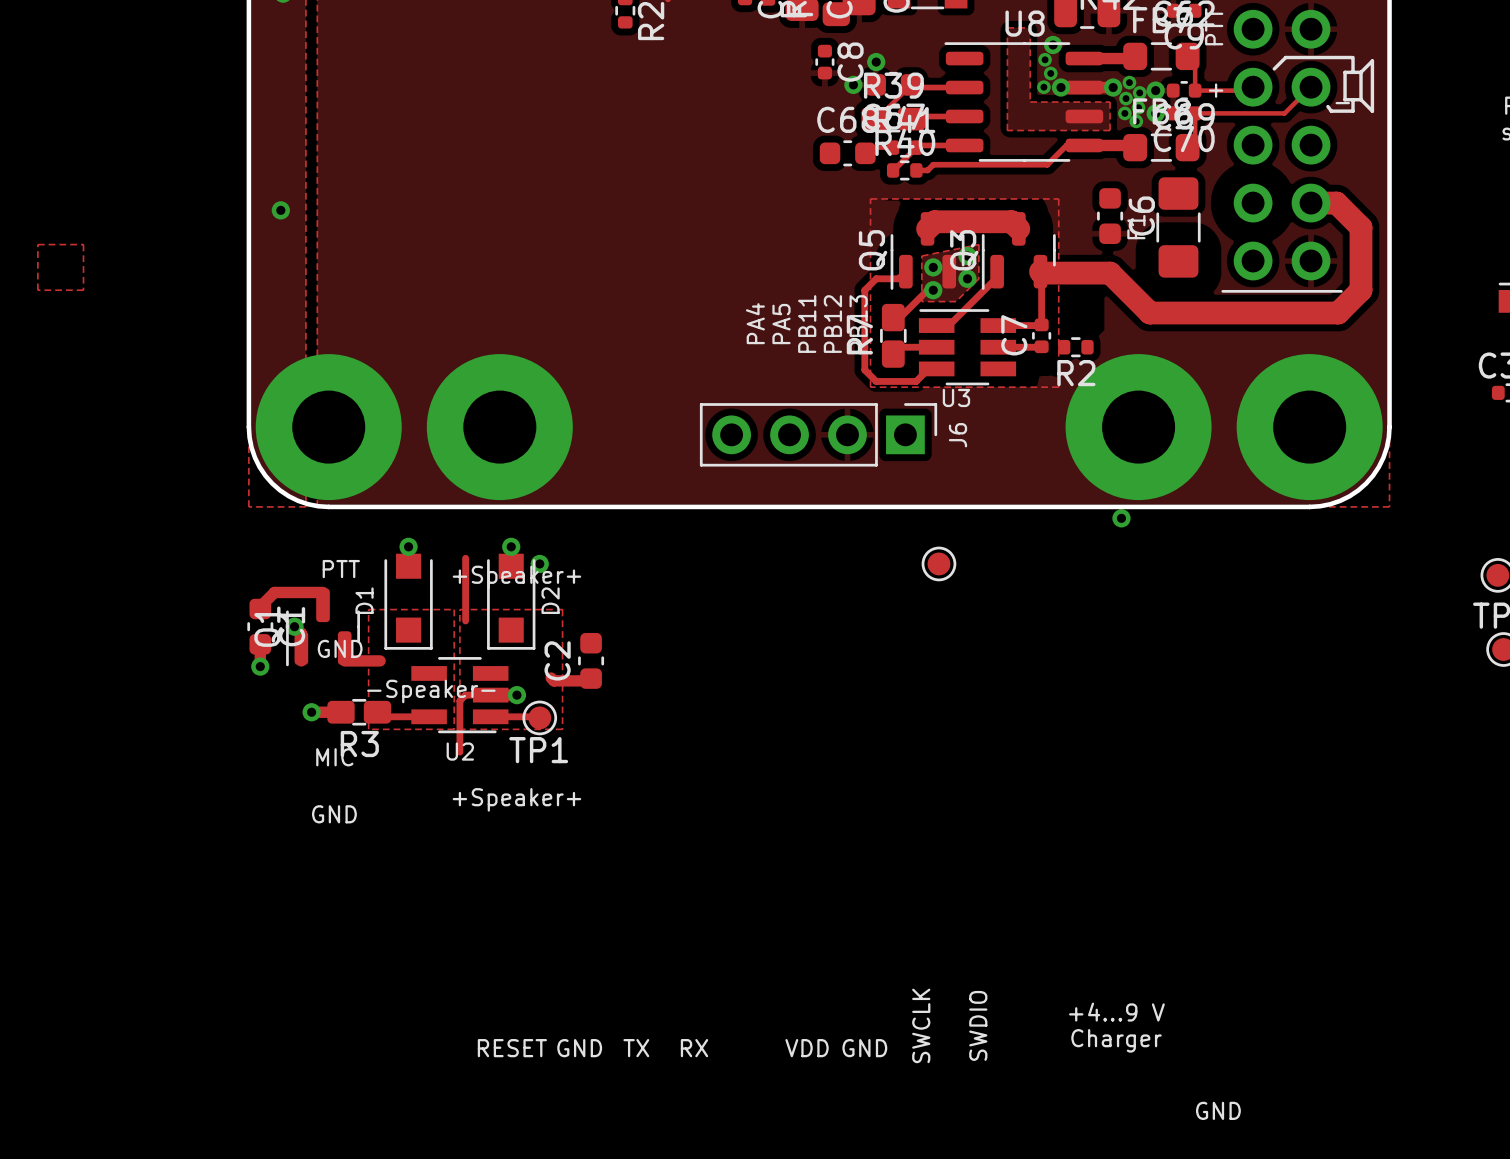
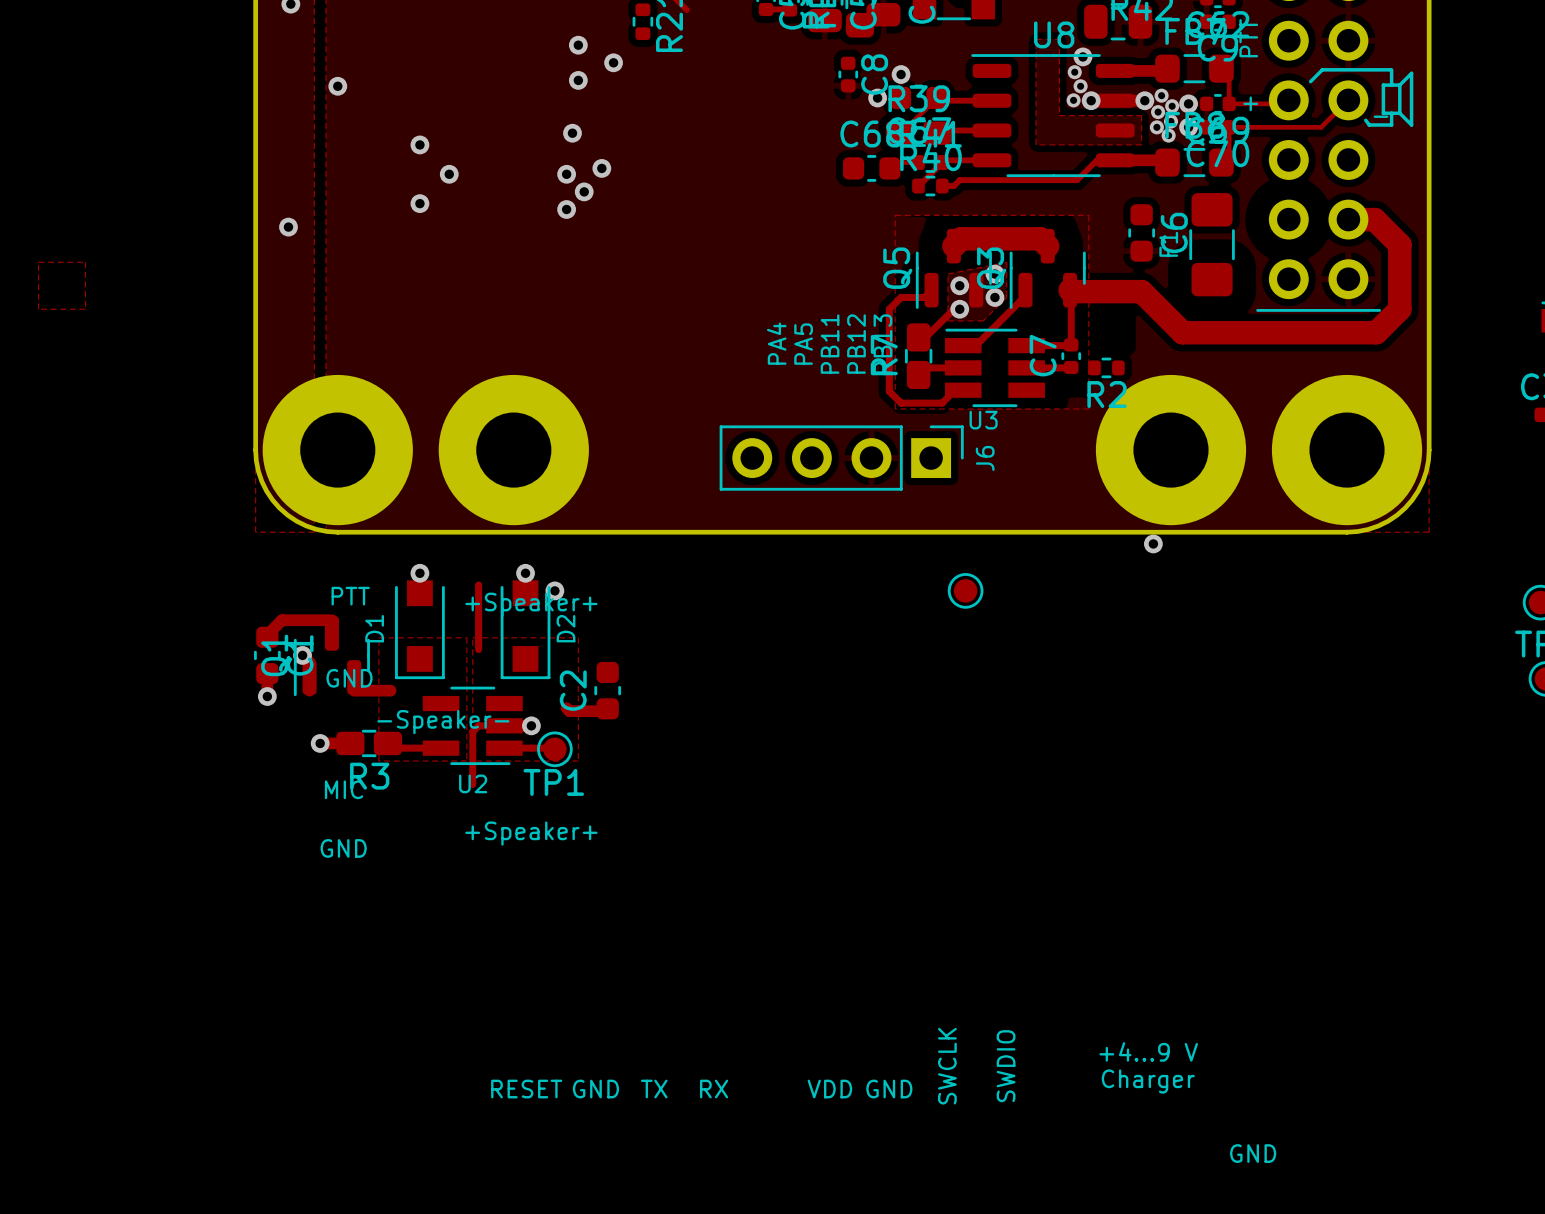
via: none -> (578, 45)
via: none -> (613, 62)
via: none -> (578, 80)
via: none -> (337, 86)
via: none -> (572, 133)
via: none -> (419, 144)
via: none -> (601, 168)
via: none -> (449, 174)
via: none -> (566, 174)
via: none -> (584, 191)
via: none -> (419, 203)
via: none -> (566, 209)

